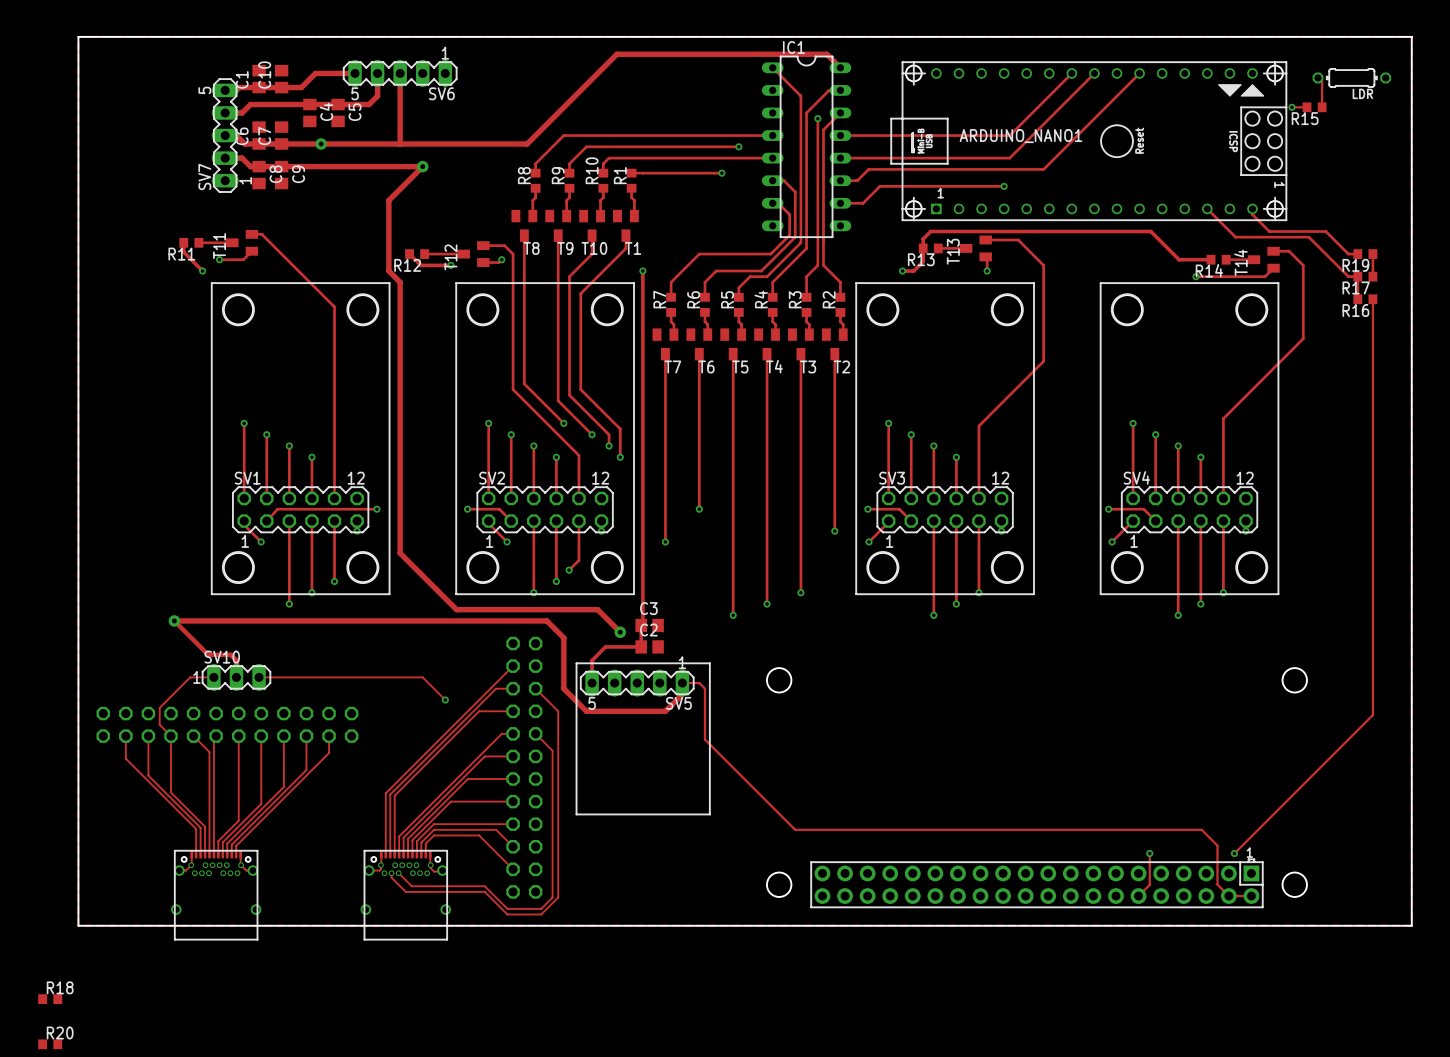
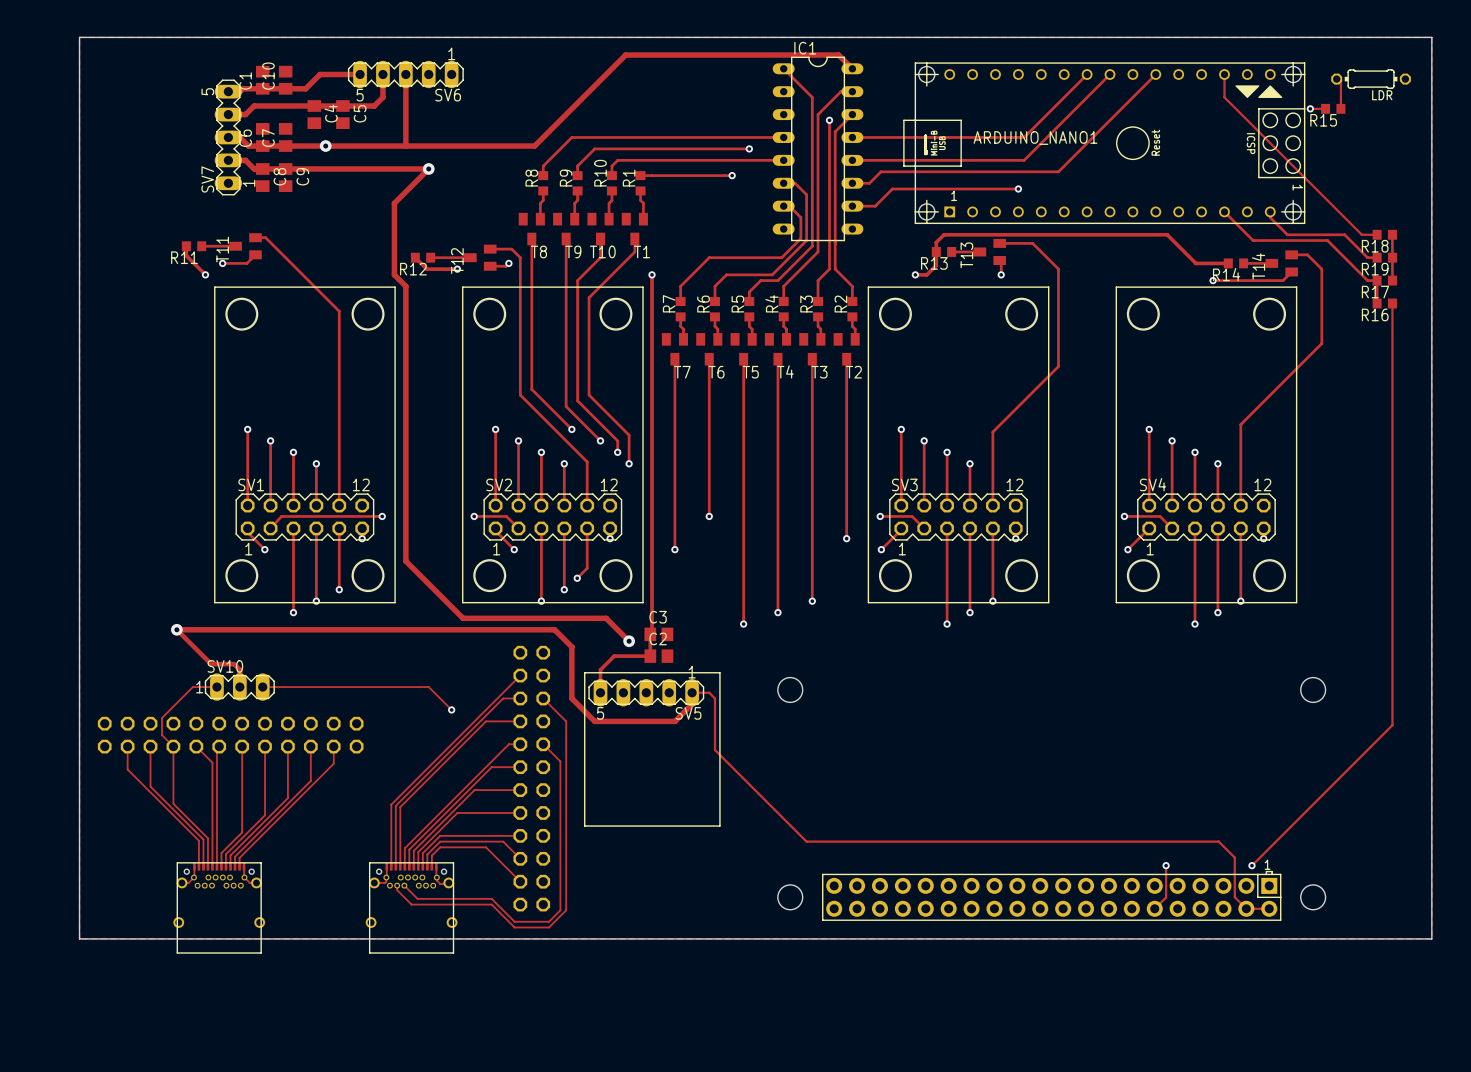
track: none -> (1224, 74) (1224, 97) (1361, 234) (1377, 234)
track: none -> (1392, 234) (1392, 257)
R18 name position: R18 (60, 987) -> R18 (1375, 246)
R18 position: (50, 999) -> (1384, 234)
R20: (50, 1044) -> none

